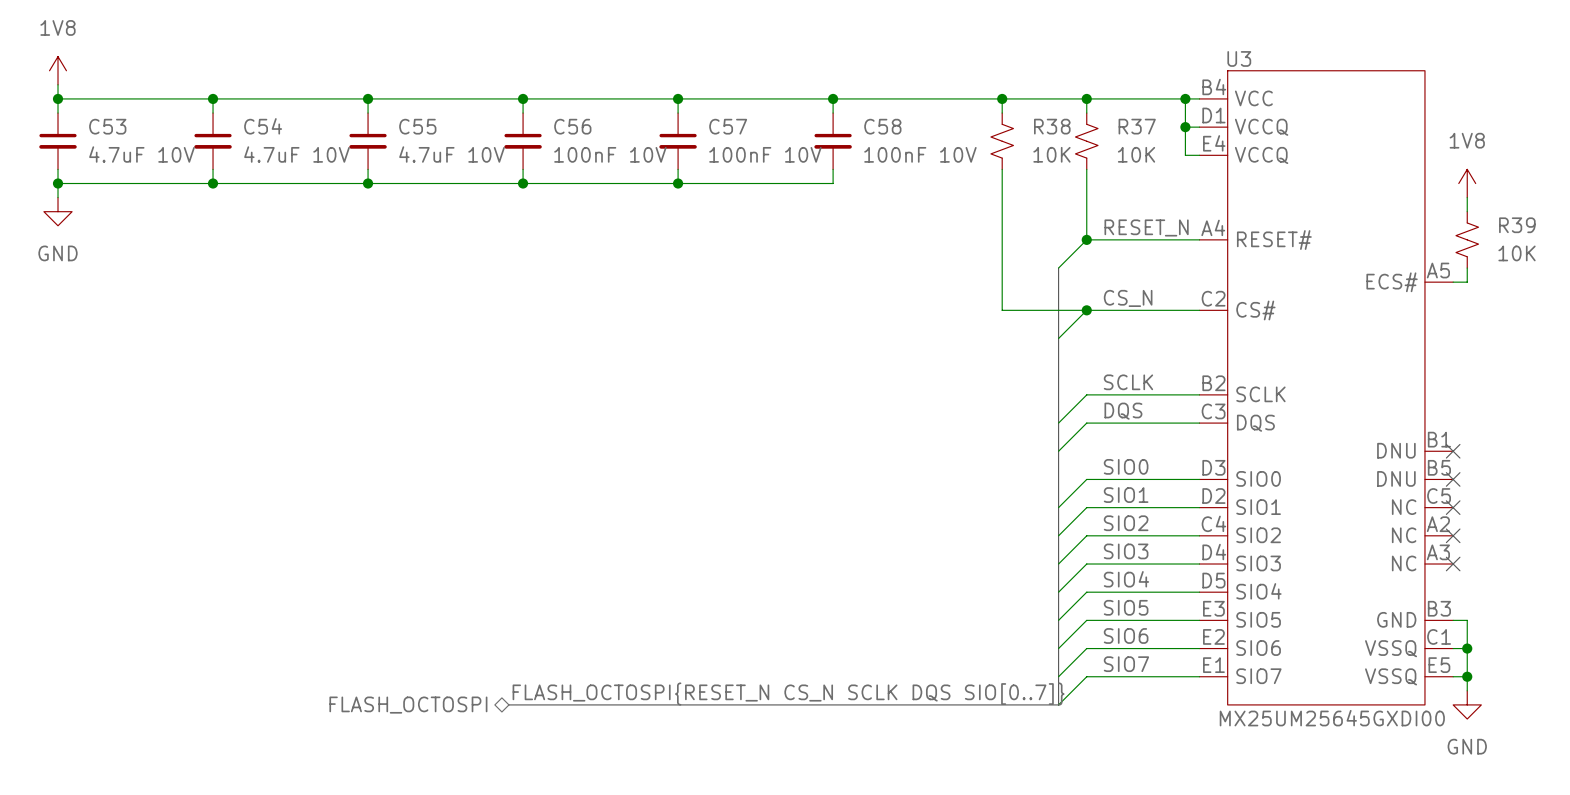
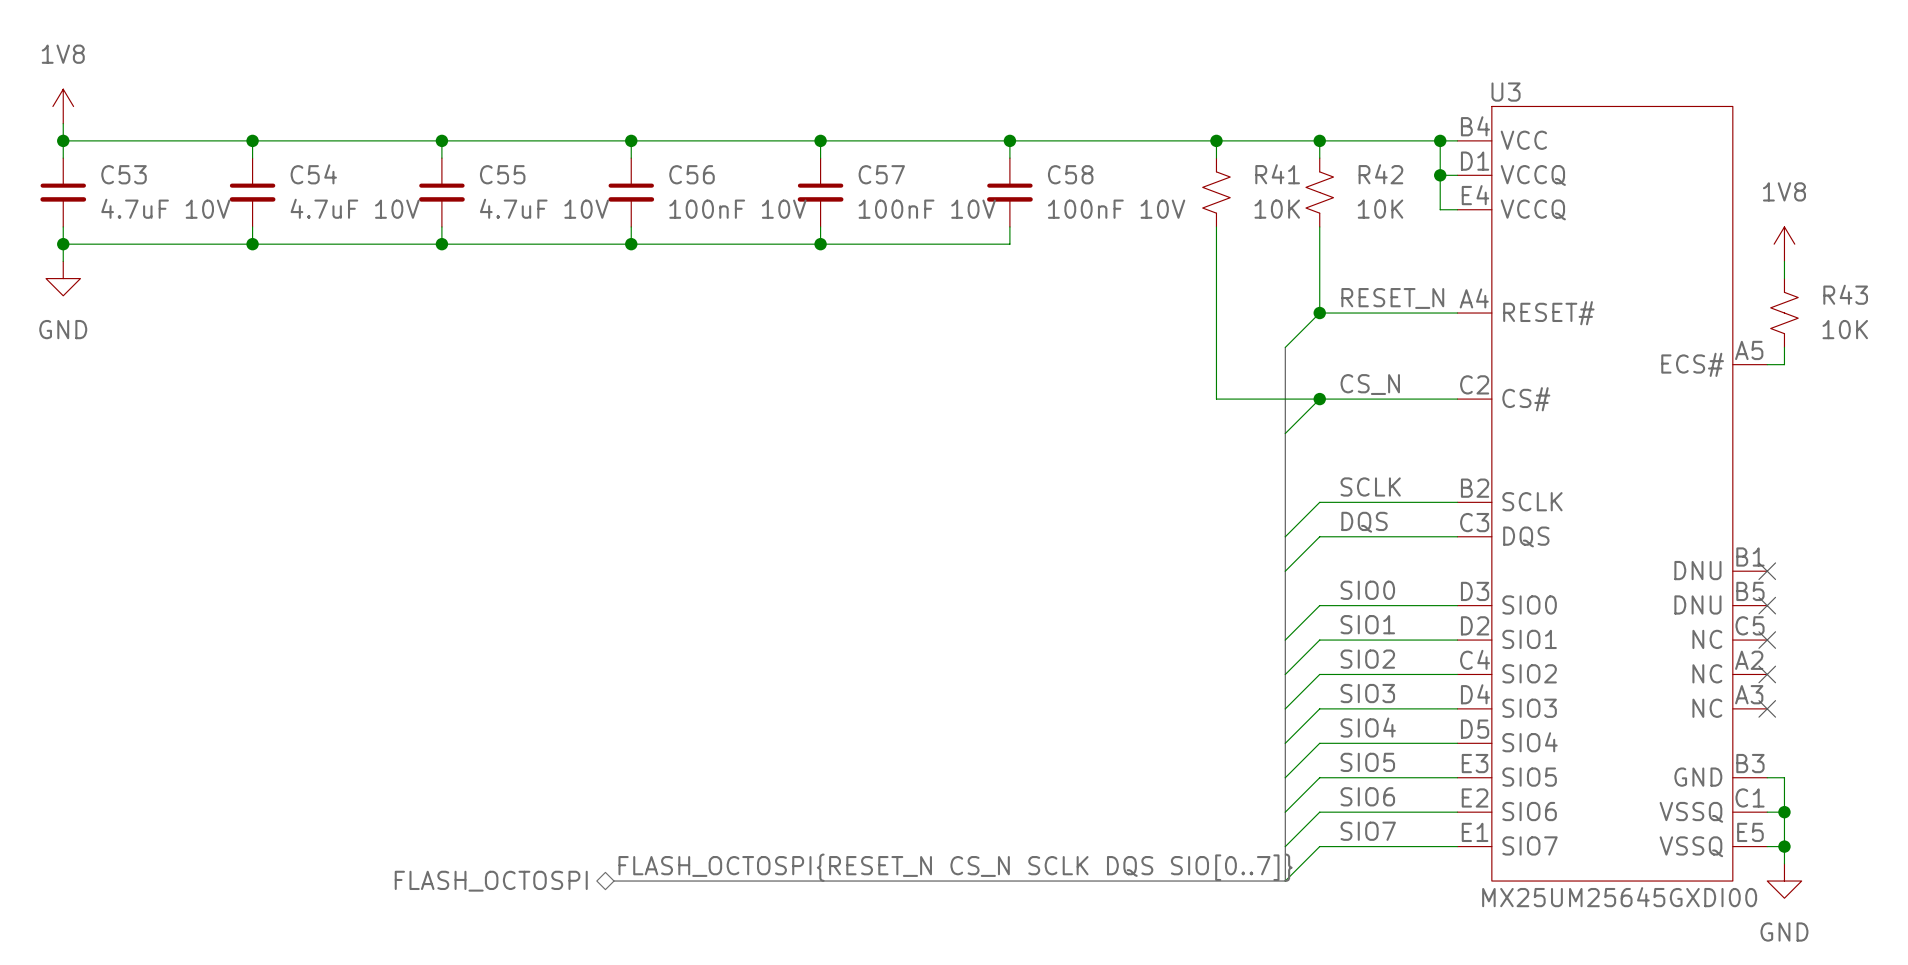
R38 name: R38 (1052, 126) -> R41 (1277, 174)
R37 name: R37 (1137, 126) -> R42 (1380, 174)
R39 name: R39 (1517, 225) -> R43 (1845, 294)

